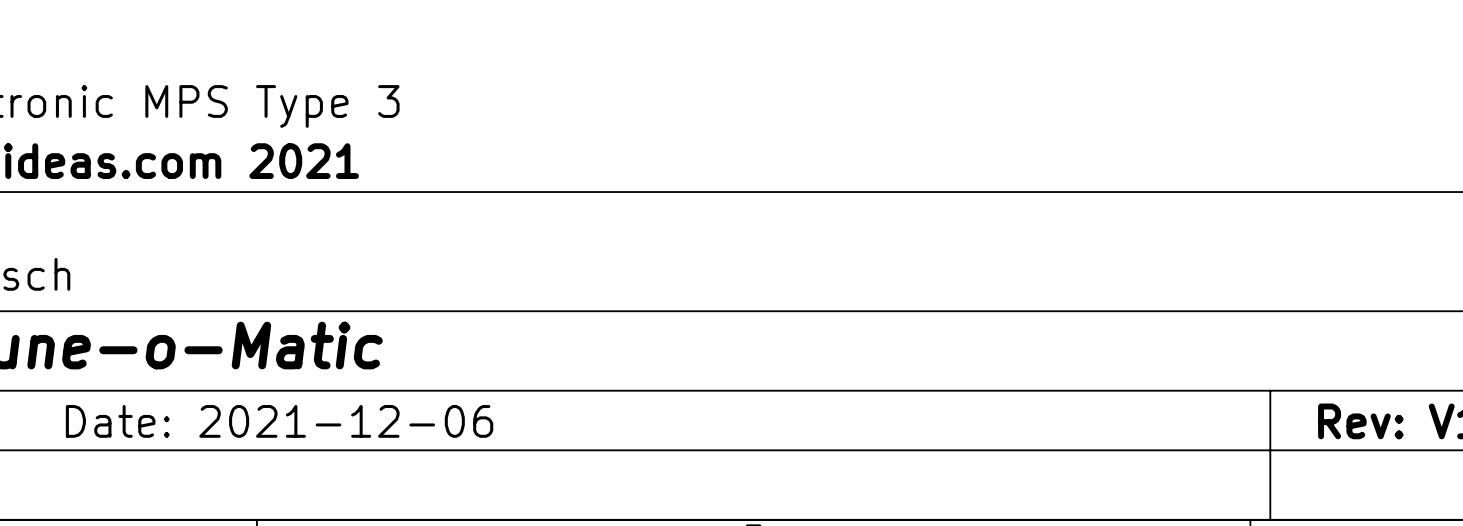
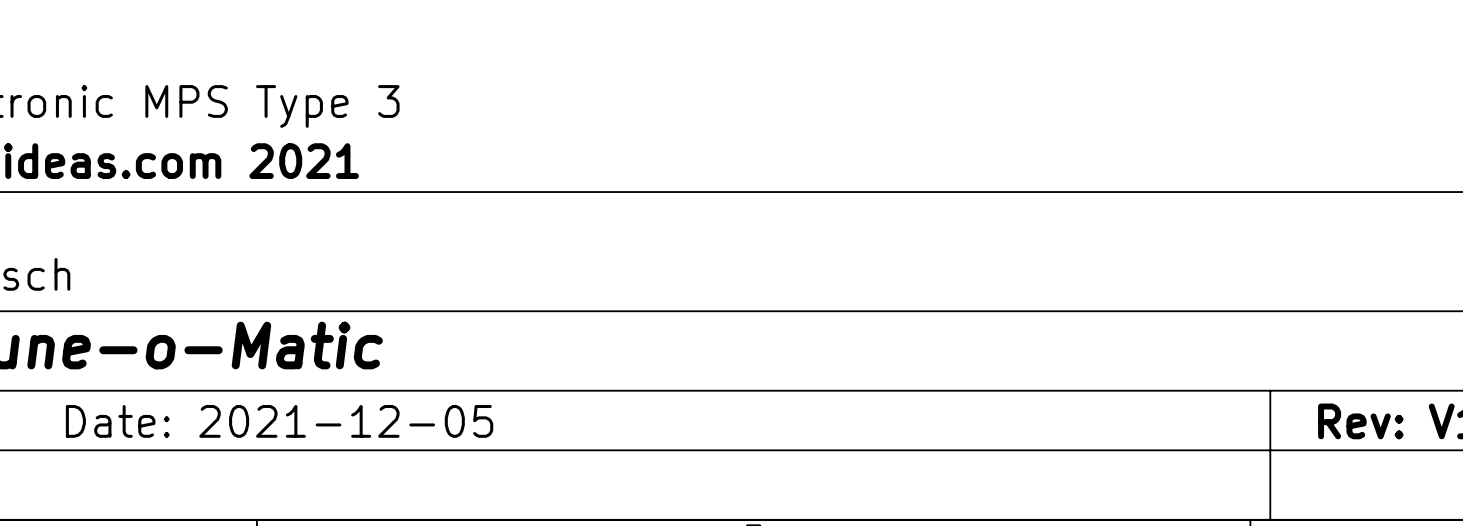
title block: Date: 2021-12-06 (279, 421) -> Date: 2021-12-05 (279, 421)

